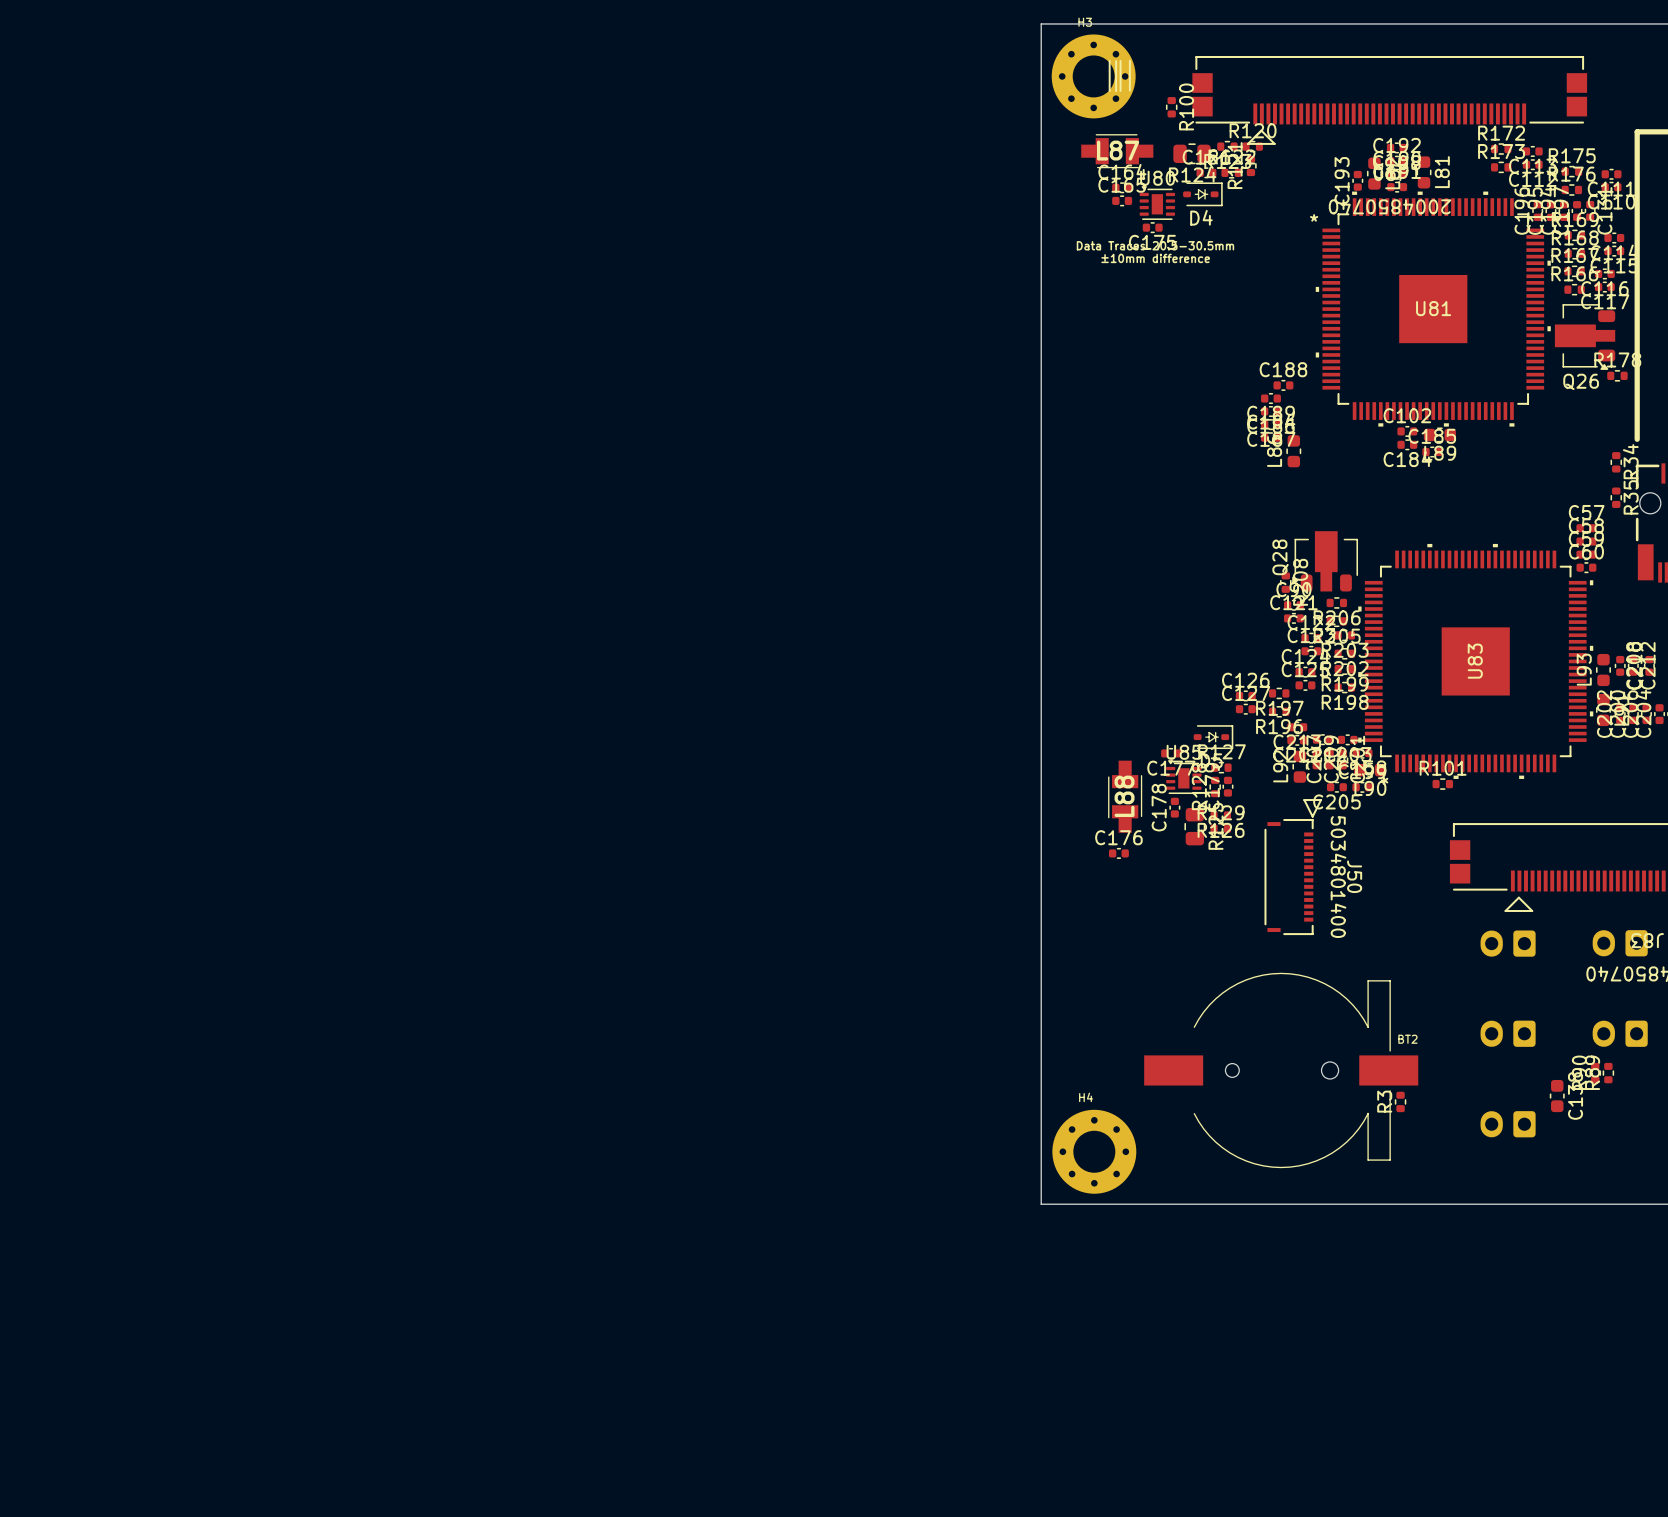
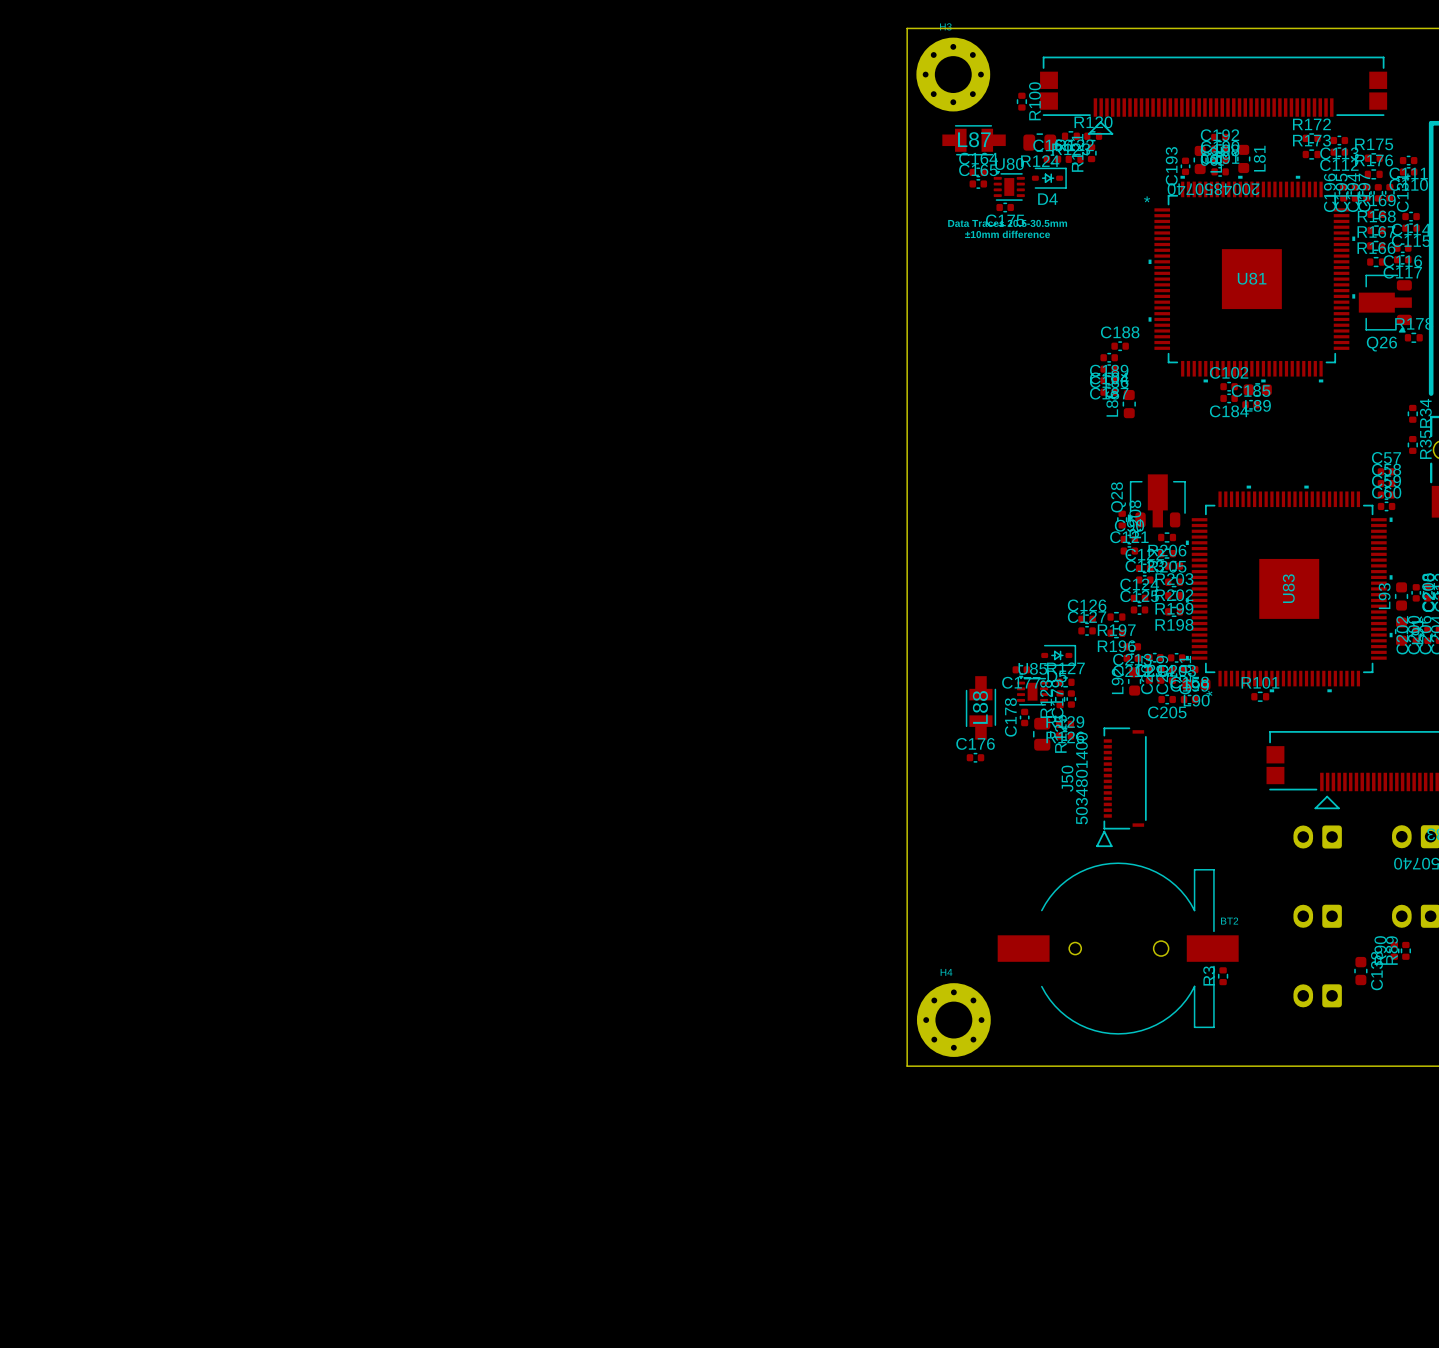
line: (1109, 60) (1109, 90) -> none
line: (1120, 60) (1120, 90) -> none
line: (1129, 60) (1129, 90) -> none
line: (1116, 61) (1116, 91) -> none
J50 rotation: 0° (1293, 867) -> 180° (1121, 787)

